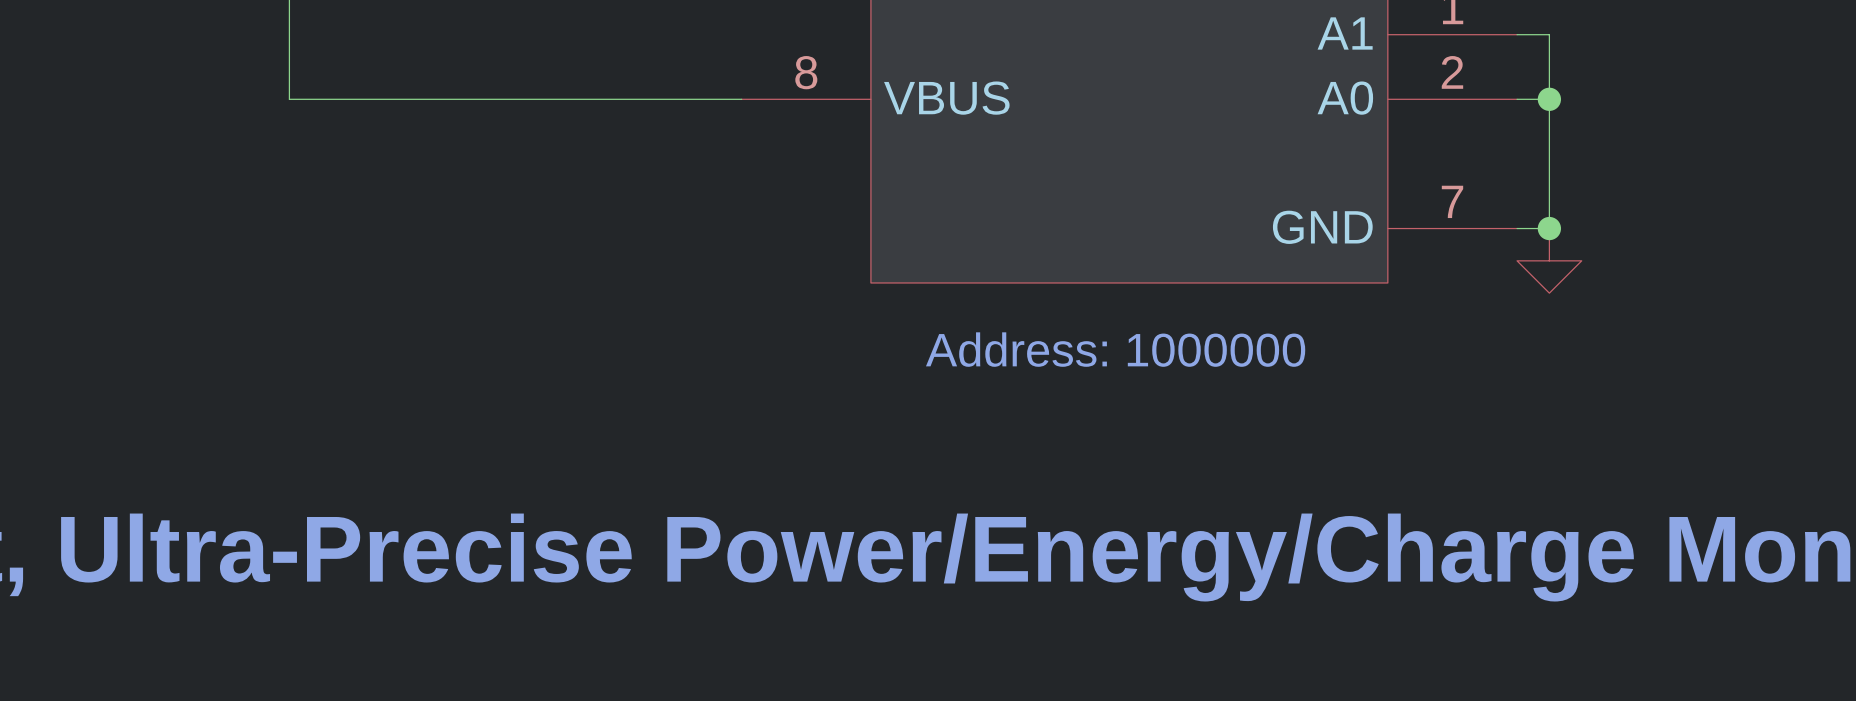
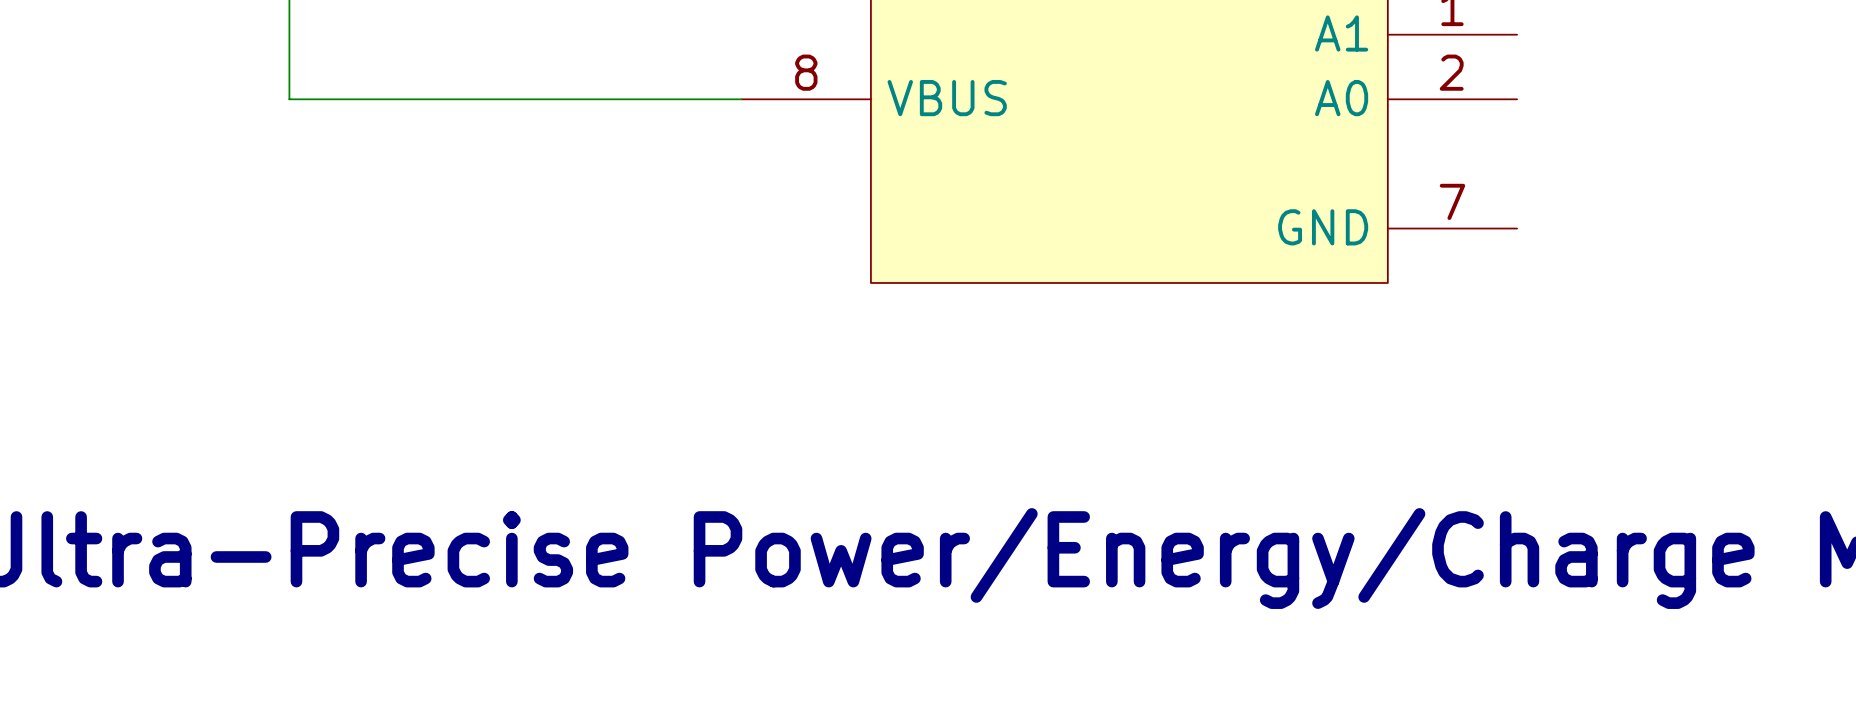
wire: (1517, 34) (1549, 34) (1549, 228) (1517, 228) -> none
wire: (1517, 99) (1549, 99) -> none
junction: (1549, 99) -> none
junction: (1549, 228) -> none
power symbol: (1549, 260) -> none
text: Address: 1000000 (1115, 349) -> none

